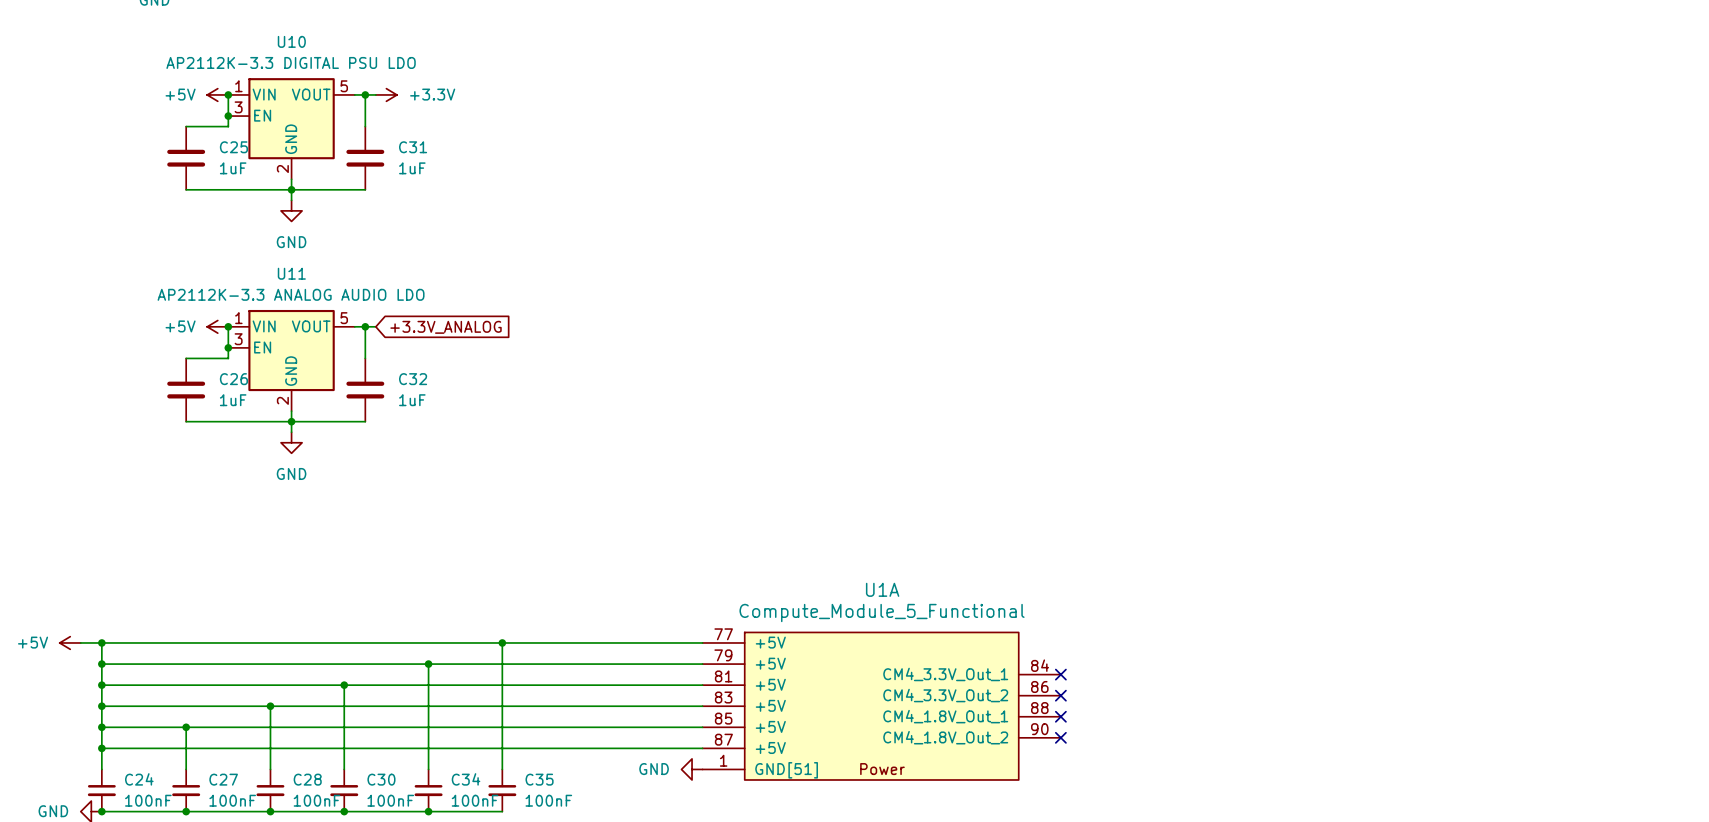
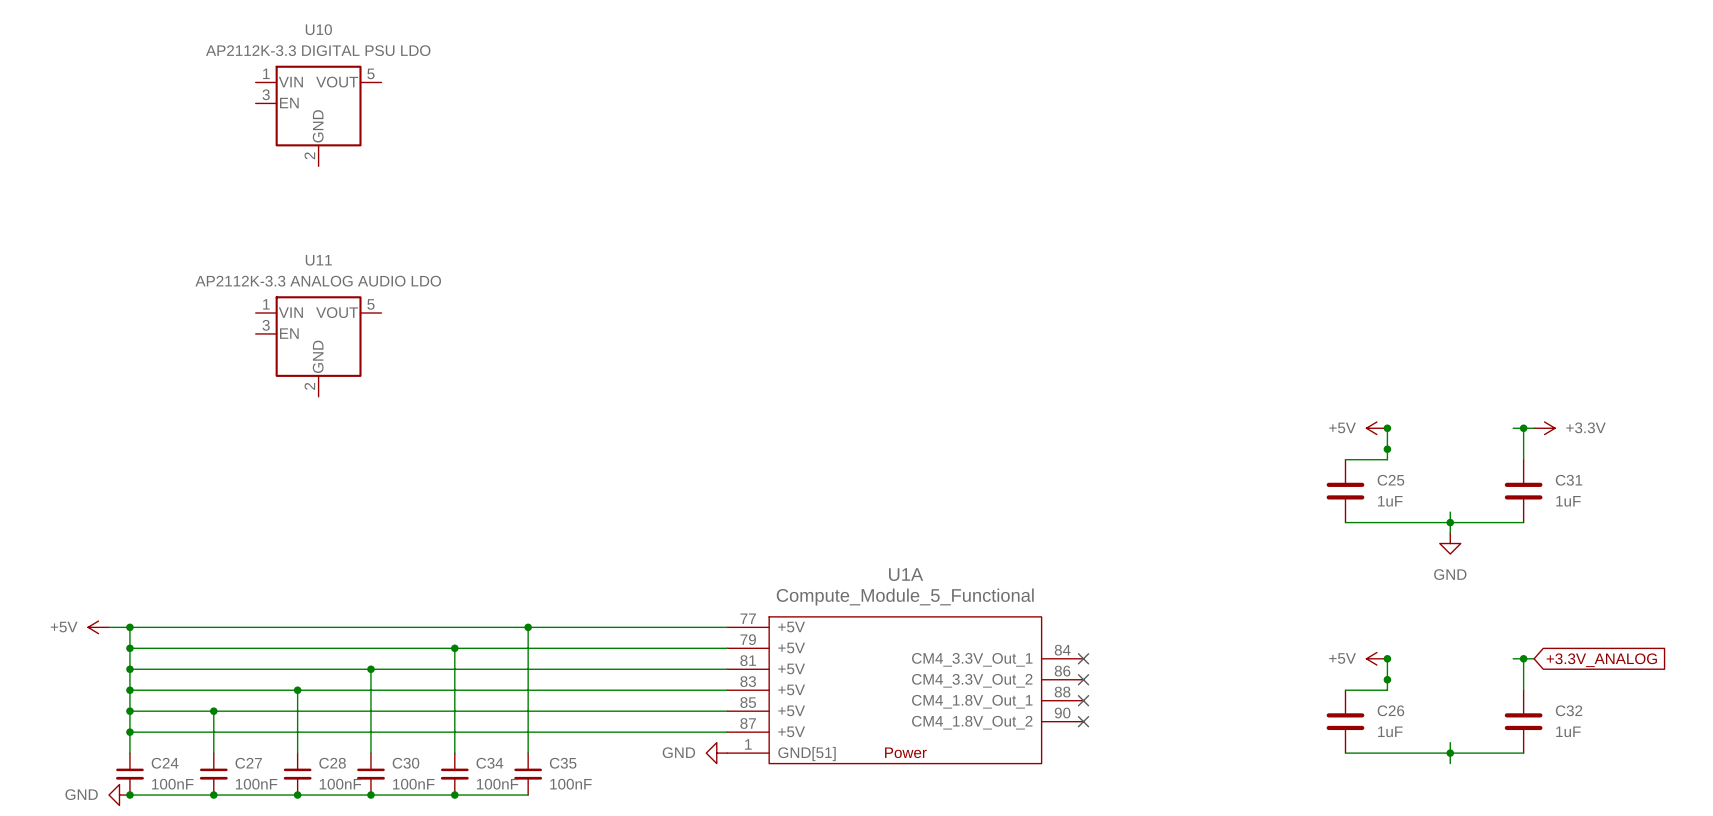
power symbol: +5V (217, 94) -> none
wire: (228, 94) (228, 126) (186, 126) -> none
junction: (228, 94) -> none
wire: (354, 94) (375, 94) -> none
wire: (365, 94) (365, 126) -> none
junction: (365, 94) -> none
power symbol: +3.3V (386, 94) -> none
junction: (228, 116) -> none
C25 position: (186, 158) -> (1345, 491)
C31 position: (365, 158) -> (1523, 491)
wire: (291, 179) (291, 200) -> none
wire: (186, 189) (365, 189) -> none
junction: (291, 189) -> none
power symbol: GND (291, 210) -> none
power symbol: +5V (217, 326) -> none
wire: (228, 326) (228, 358) (186, 358) -> none
junction: (228, 326) -> none
wire: (354, 326) (375, 326) -> none
wire: (365, 326) (365, 358) -> none
junction: (365, 326) -> none
global label: +3.3V_ANALOG (446, 327) -> none
junction: (228, 347) -> none
C26 position: (186, 390) -> (1345, 721)
C32 position: (365, 390) -> (1523, 721)
wire: (291, 411) (291, 432) -> none
wire: (186, 421) (365, 421) -> none
junction: (291, 421) -> none
power symbol: GND (291, 442) -> none
power symbol: none -> +5V (1376, 428)
wire: none -> (1387, 428) (1387, 459) (1345, 459)
junction: none -> (1387, 428)
wire: none -> (1513, 428) (1534, 428)
wire: none -> (1523, 428) (1523, 459)
junction: none -> (1523, 428)
power symbol: none -> +3.3V (1544, 428)
junction: none -> (1387, 449)
wire: none -> (1450, 512) (1450, 533)
wire: none -> (1345, 522) (1523, 522)
junction: none -> (1450, 522)
power symbol: none -> GND (1450, 543)
power symbol: none -> +5V (1376, 658)
wire: none -> (1387, 658) (1387, 690) (1345, 690)
junction: none -> (1387, 658)
wire: none -> (1513, 658) (1534, 658)
wire: none -> (1523, 658) (1523, 690)
junction: none -> (1523, 658)
global label: none -> +3.3V_ANALOG (1601, 660)
junction: none -> (1387, 679)
wire: none -> (1450, 742) (1450, 763)
wire: none -> (1345, 753) (1523, 753)
junction: none -> (1450, 753)

